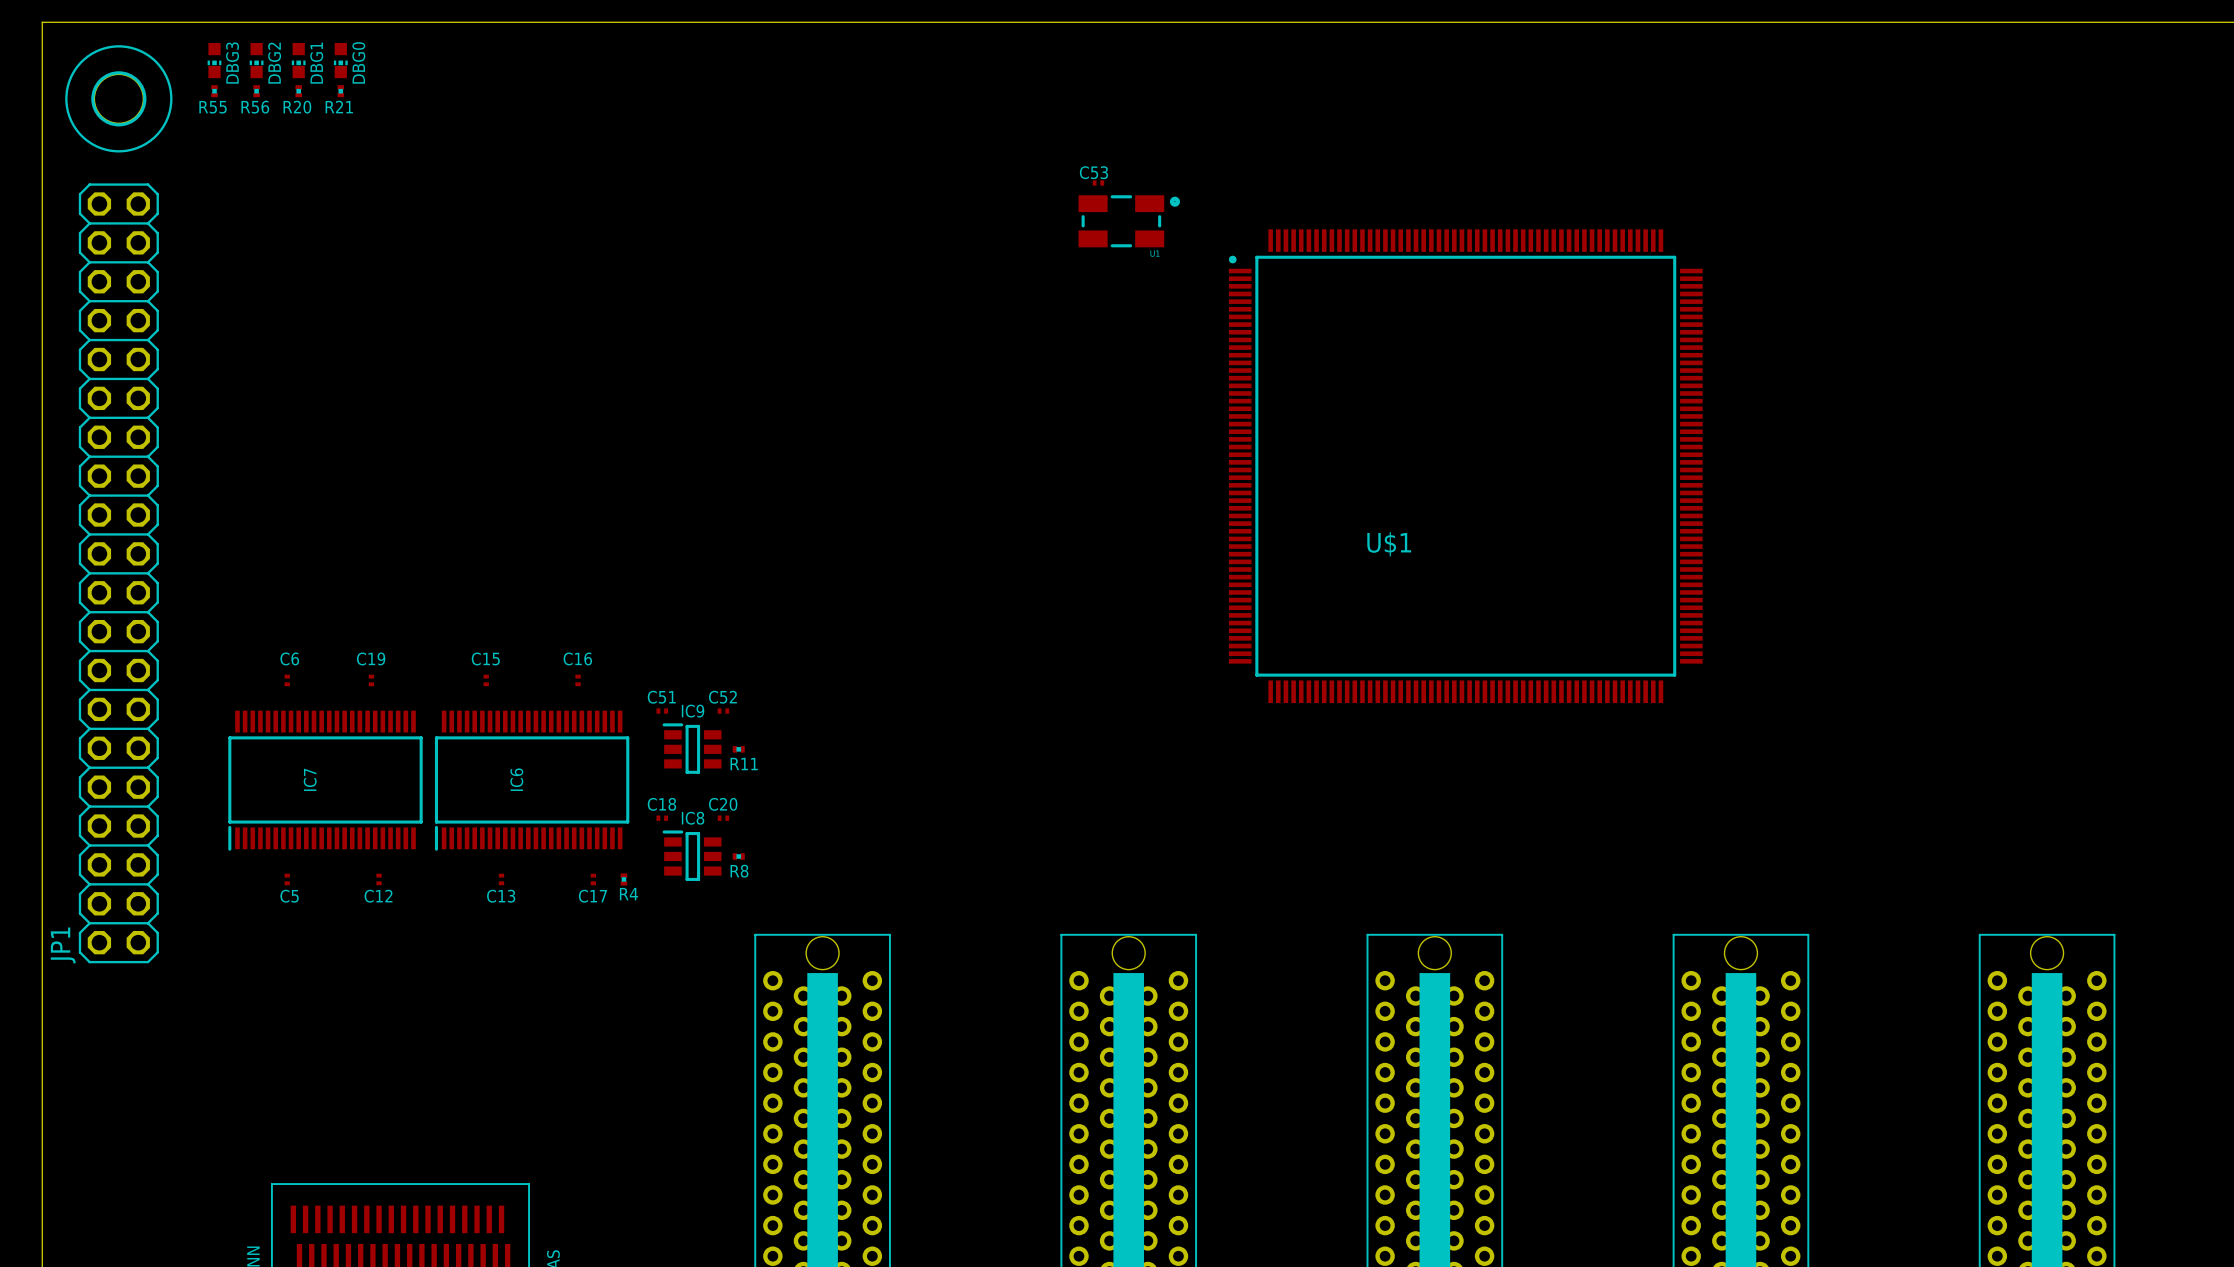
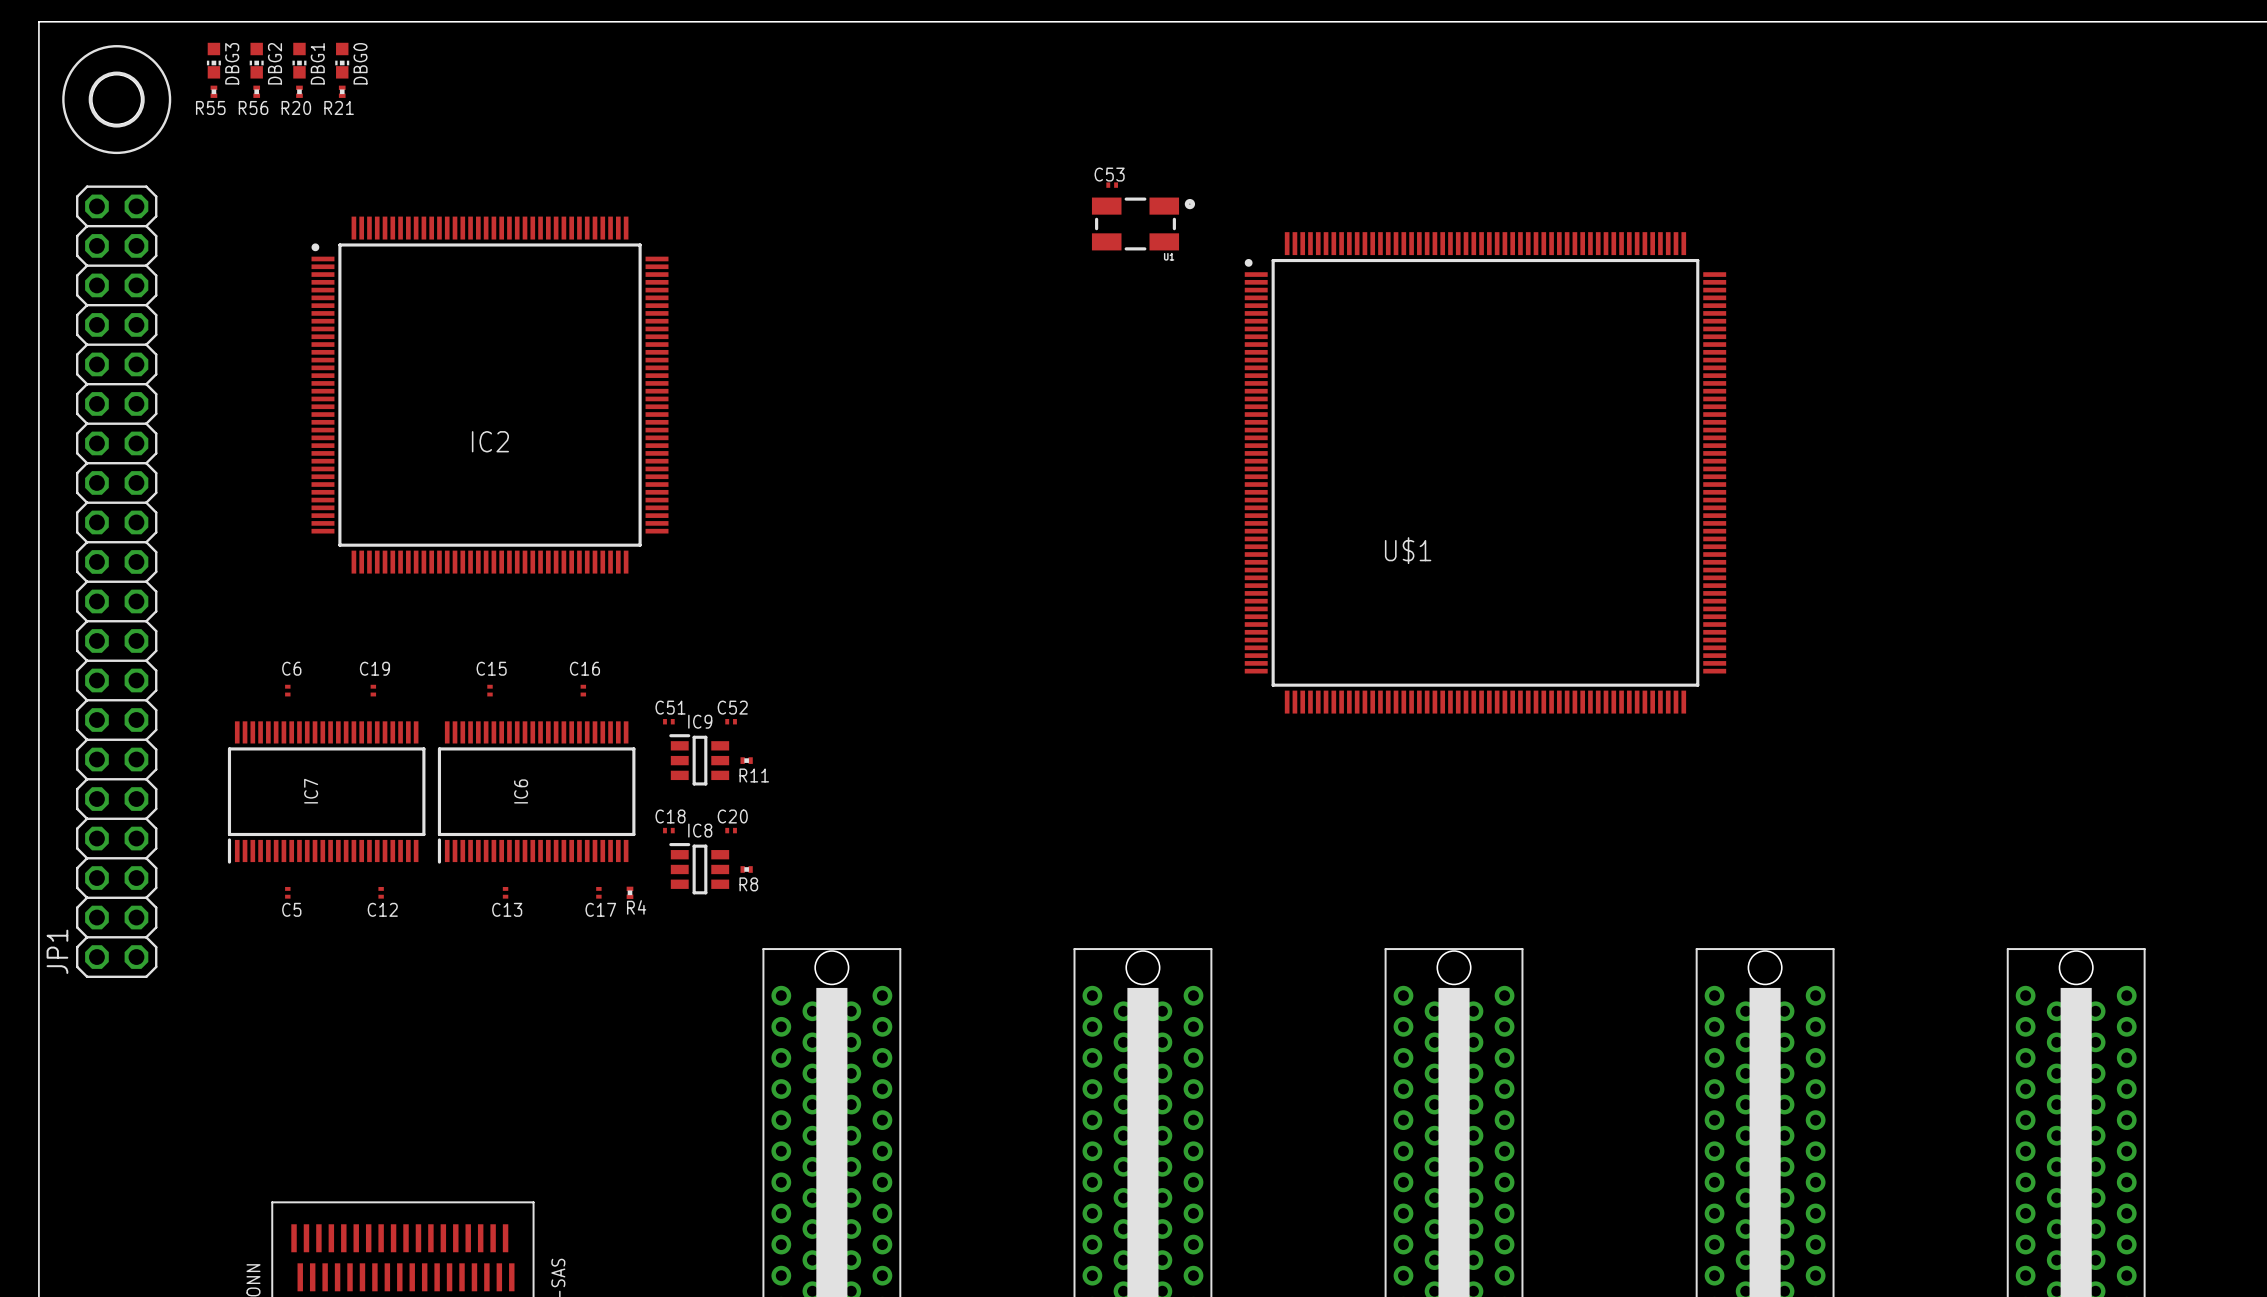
IC2: none -> (490, 395)

